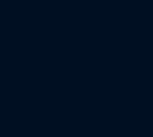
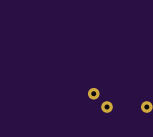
via: none -> (93, 93)
via: none -> (107, 107)
via: none -> (146, 107)

